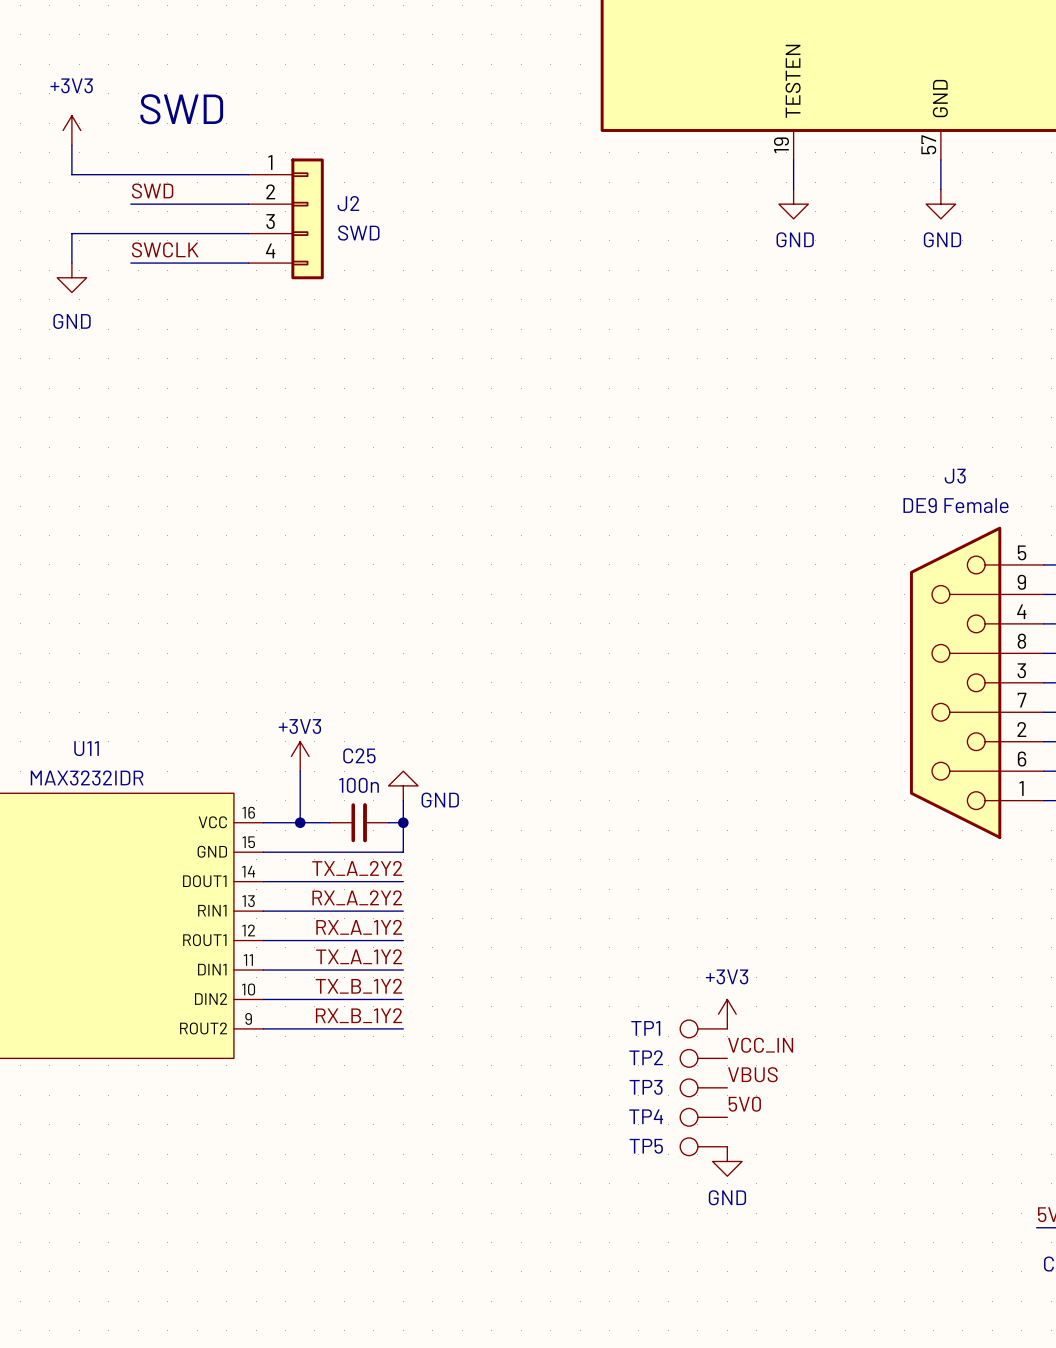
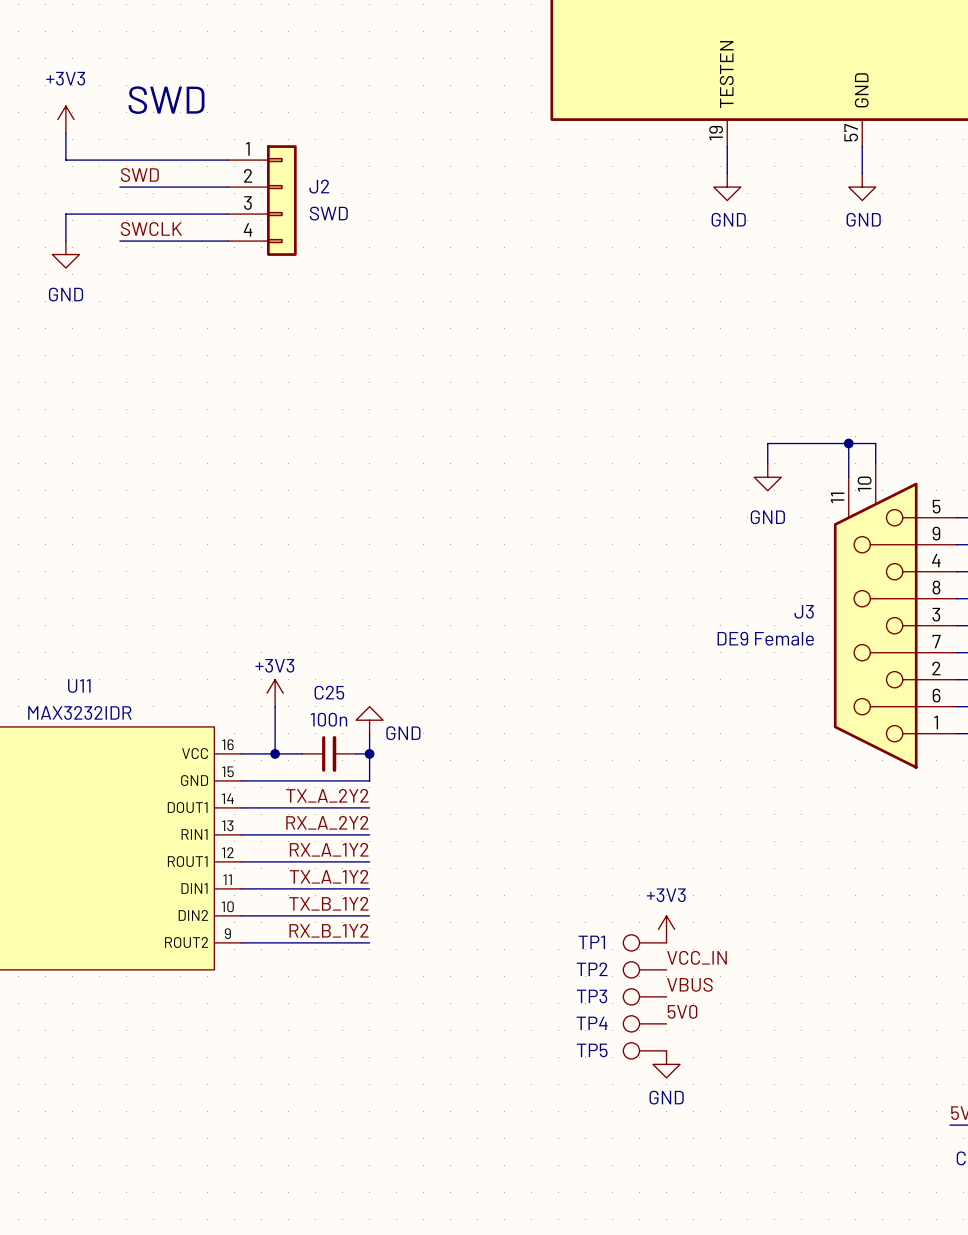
J3 name position: J3 (955, 476) -> J3 (804, 611)
wire: none -> (848, 443) (848, 477)
junction: none -> (848, 443)
J3 value position: DE9 Female (955, 505) -> DE9 Female (765, 638)
wire: none -> (767, 463) (767, 443) (875, 443) (875, 463)
power symbol: none -> GND (767, 477)
J3 symbol: [909, 526, 1044, 839] -> [833, 463, 957, 769]

